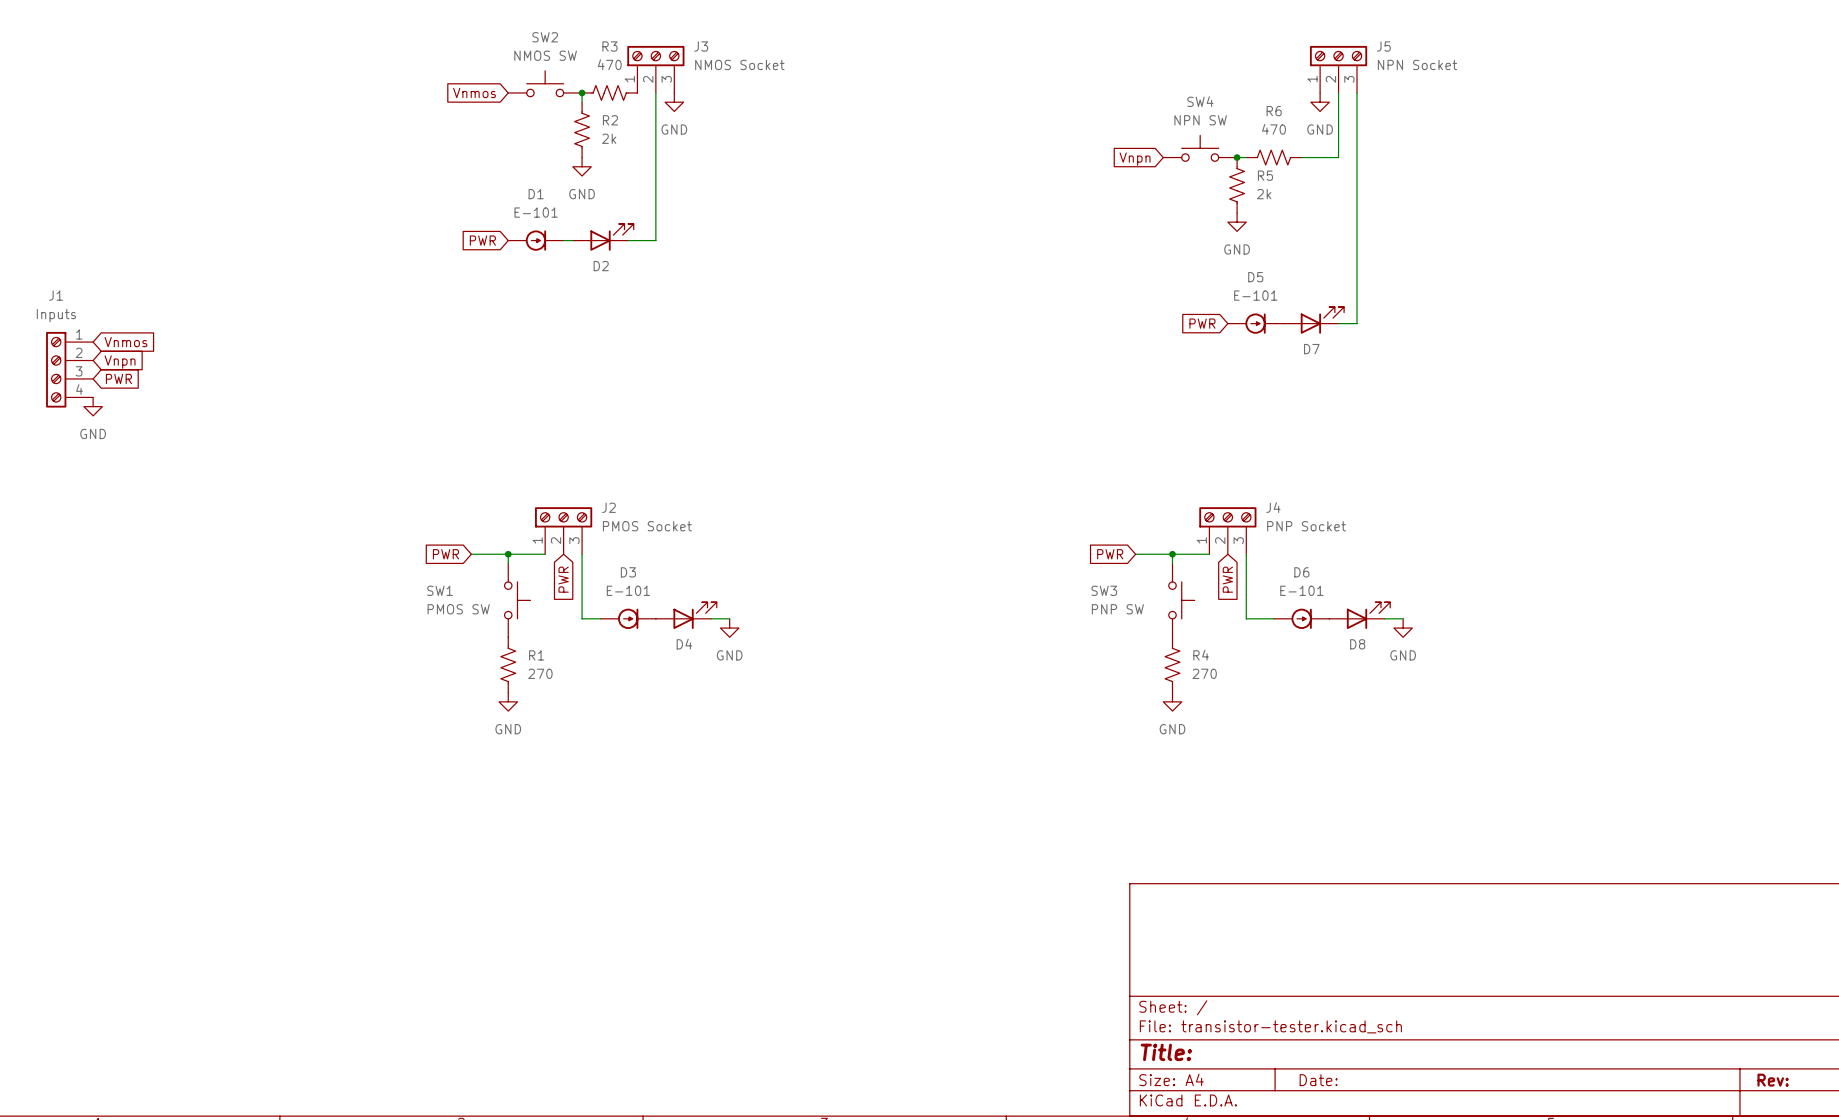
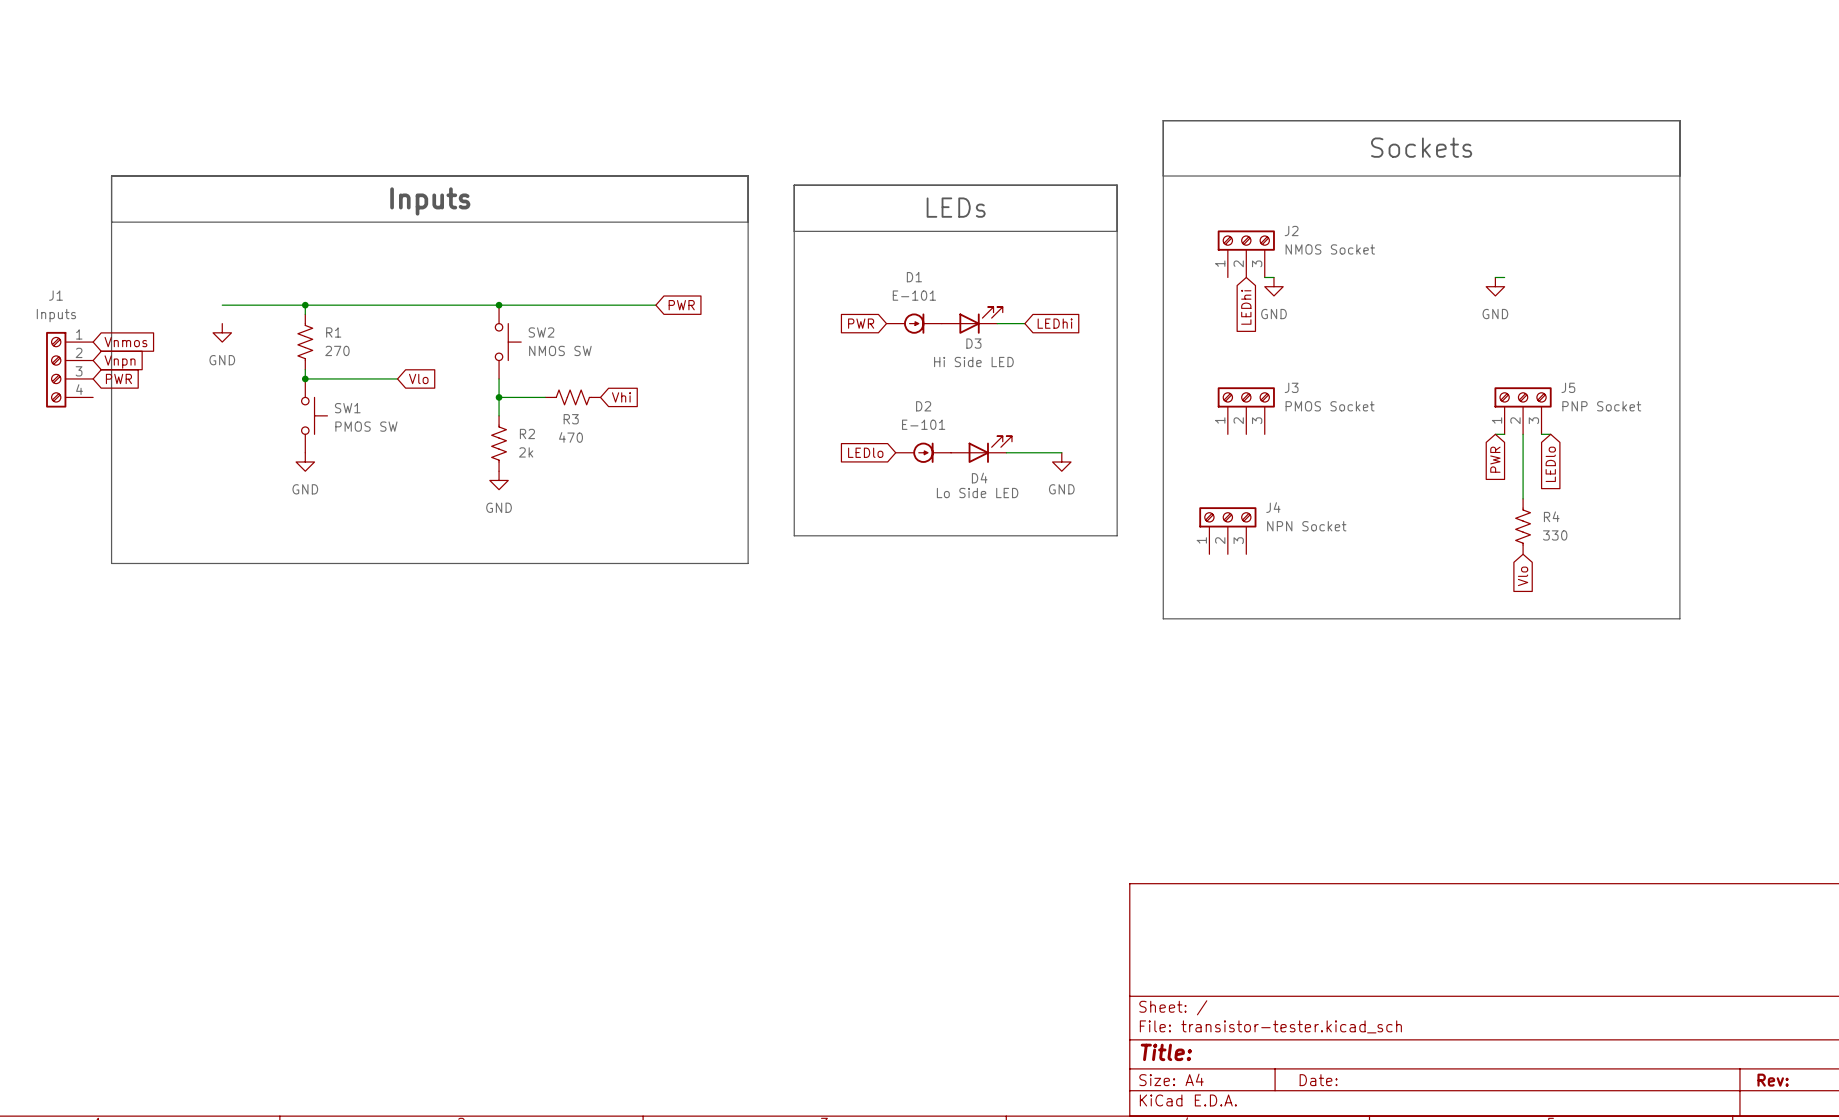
R3 name position: R3 (609, 46) -> R3 (571, 419)
SW2 value position: NMOS SW (545, 55) -> NMOS SW (560, 350)
R3 value position: 470 (609, 64) -> 470 (570, 437)
J3 value: NMOS Socket (739, 64) -> PMOS Socket (1330, 406)
J5 value: NPN Socket (1417, 64) -> PNP Socket (1601, 406)
J3 position: (655, 69) -> (1246, 410)
J5 position: (1338, 69) -> (1523, 410)
SW2 rotation: 0° (545, 83) -> 90° clockwise (508, 342)
SW2 position: (545, 83) -> (508, 342)
global label: Vnmos (474, 92) -> none
wire: (582, 92) (582, 102) -> none
junction: (582, 92) -> none
R3 position: (609, 92) -> (572, 397)
wire: (655, 92) (655, 240) (628, 240) -> none
wire: (1338, 92) (1338, 157) (1301, 157) -> none
wire: (1357, 92) (1357, 323) (1338, 323) -> none
power symbol: GND (674, 102) -> none
power symbol: GND (1320, 102) -> none
line: none -> (1163, 120) (1679, 120) (1679, 618) (1163, 618) (1163, 120)
R2 position: (582, 129) -> (499, 443)
text: none -> Sockets (1421, 147)
SW4: NPN SW (1200, 148) -> none
wire: (1237, 157) (1246, 157) -> (1264, 277) (1273, 277)
junction: (1237, 157) -> none
R6: 470 (1273, 157) -> none
global label: Vnpn (1135, 159) -> none
power symbol: GND (582, 166) -> none
line: none -> (111, 176) (748, 176) (748, 563) (111, 563) (111, 176)
line: none -> (1163, 176) (1679, 176)
line: none -> (794, 185) (1117, 185) (1117, 535) (794, 535) (794, 185)
R5: 2k (1237, 185) -> none
text: none -> Inputs (430, 201)
text: none -> LEDs (956, 207)
line: none -> (111, 222) (748, 222)
power symbol position: GND (1237, 222) -> GND (1273, 286)
D2 symbol: [572, 223, 634, 251] -> [895, 442, 952, 463]
line: none -> (794, 231) (1117, 231)
global label: PWR (482, 240) -> none
D1 position: (535, 240) -> (914, 323)
wire: (563, 240) (572, 240) -> none
D2 name position: D2 (601, 266) -> D2 (923, 406)
wire: none -> (1495, 277) (1504, 277)
power symbol: none -> GND (1495, 286)
wire: none -> (222, 305) (655, 305)
wire: none -> (305, 305) (305, 314)
junction: none -> (305, 305)
junction: none -> (499, 305)
global label: none -> PWR (681, 305)
global label: none -> LEDhi (1246, 307)
D7: (1313, 320) -> none
global label: none -> PWR (861, 323)
wire: none -> (997, 323) (1024, 323)
global label: none -> LEDhi (1055, 323)
global label: PWR (1202, 323) -> none
D5: E-101 (1255, 323) -> none
power symbol: none -> GND (222, 332)
wire: none -> (305, 369) (305, 378) (397, 378)
junction: none -> (305, 378)
global label: none -> Vlo (418, 378)
wire: none -> (499, 378) (499, 415)
wire: none -> (499, 397) (545, 397)
junction: none -> (499, 397)
global label: none -> Vhi (621, 397)
power symbol: GND (93, 406) -> none
D2 value: none -> E-101 (923, 424)
wire: none -> (1495, 434) (1504, 434)
wire: none -> (1523, 434) (1523, 498)
wire: none -> (1541, 434) (1550, 434)
global label: none -> LEDlo (865, 452)
wire: none -> (1006, 452) (1061, 452)
global label: none -> PWR (1495, 459)
power symbol: none -> GND (305, 462)
power symbol: none -> GND (1061, 462)
global label: none -> LEDlo (1550, 464)
power symbol: none -> GND (499, 480)
D4 value: none -> Lo Side LED (977, 493)
J2 value: PMOS Socket (647, 526) -> NMOS Socket (1330, 249)
J4 value: PNP Socket (1306, 526) -> NPN Socket (1306, 526)
J2 position: (563, 530) -> (1246, 253)
global label: PWR (445, 554) -> none
wire: (471, 554) (545, 554) -> none
wire: (508, 554) (508, 563) -> none
junction: (508, 554) -> none
wire: (582, 554) (582, 618) (600, 618) -> none
global label: PWR (1110, 554) -> none
wire: (1135, 554) (1209, 554) -> none
wire: (1172, 554) (1172, 563) -> none
junction: (1172, 554) -> none
wire: (1246, 554) (1246, 618) (1273, 618) -> none
D3 name position: D3 (628, 572) -> D3 (973, 343)
global label: none -> Vlo (1523, 576)
global label: PWR (563, 579) -> none
global label: PWR (1227, 579) -> none
SW1 name position: SW1 (440, 590) -> SW1 (347, 408)
D3 value: E-101 (628, 590) -> Hi Side LED (973, 362)
SW1 position: (517, 600) -> (314, 415)
SW3: PNP SW (1181, 600) -> none
D3 symbol: [600, 608, 656, 629] -> [941, 307, 1003, 334]
SW1 value position: PMOS SW (458, 609) -> PMOS SW (366, 426)
D4 position: (686, 615) -> (981, 449)
D8: (1359, 615) -> none
wire: (711, 618) (729, 618) -> none
D6: E-101 (1301, 618) -> none
power symbol: GND (729, 628) -> none
power symbol: GND (1403, 628) -> none
R1 position: (508, 664) -> (305, 342)
R4 position: (1172, 664) -> (1523, 526)
R4 value: 270 (1204, 673) -> 330 (1555, 535)
power symbol: GND (508, 701) -> none
power symbol: GND (1172, 701) -> none

